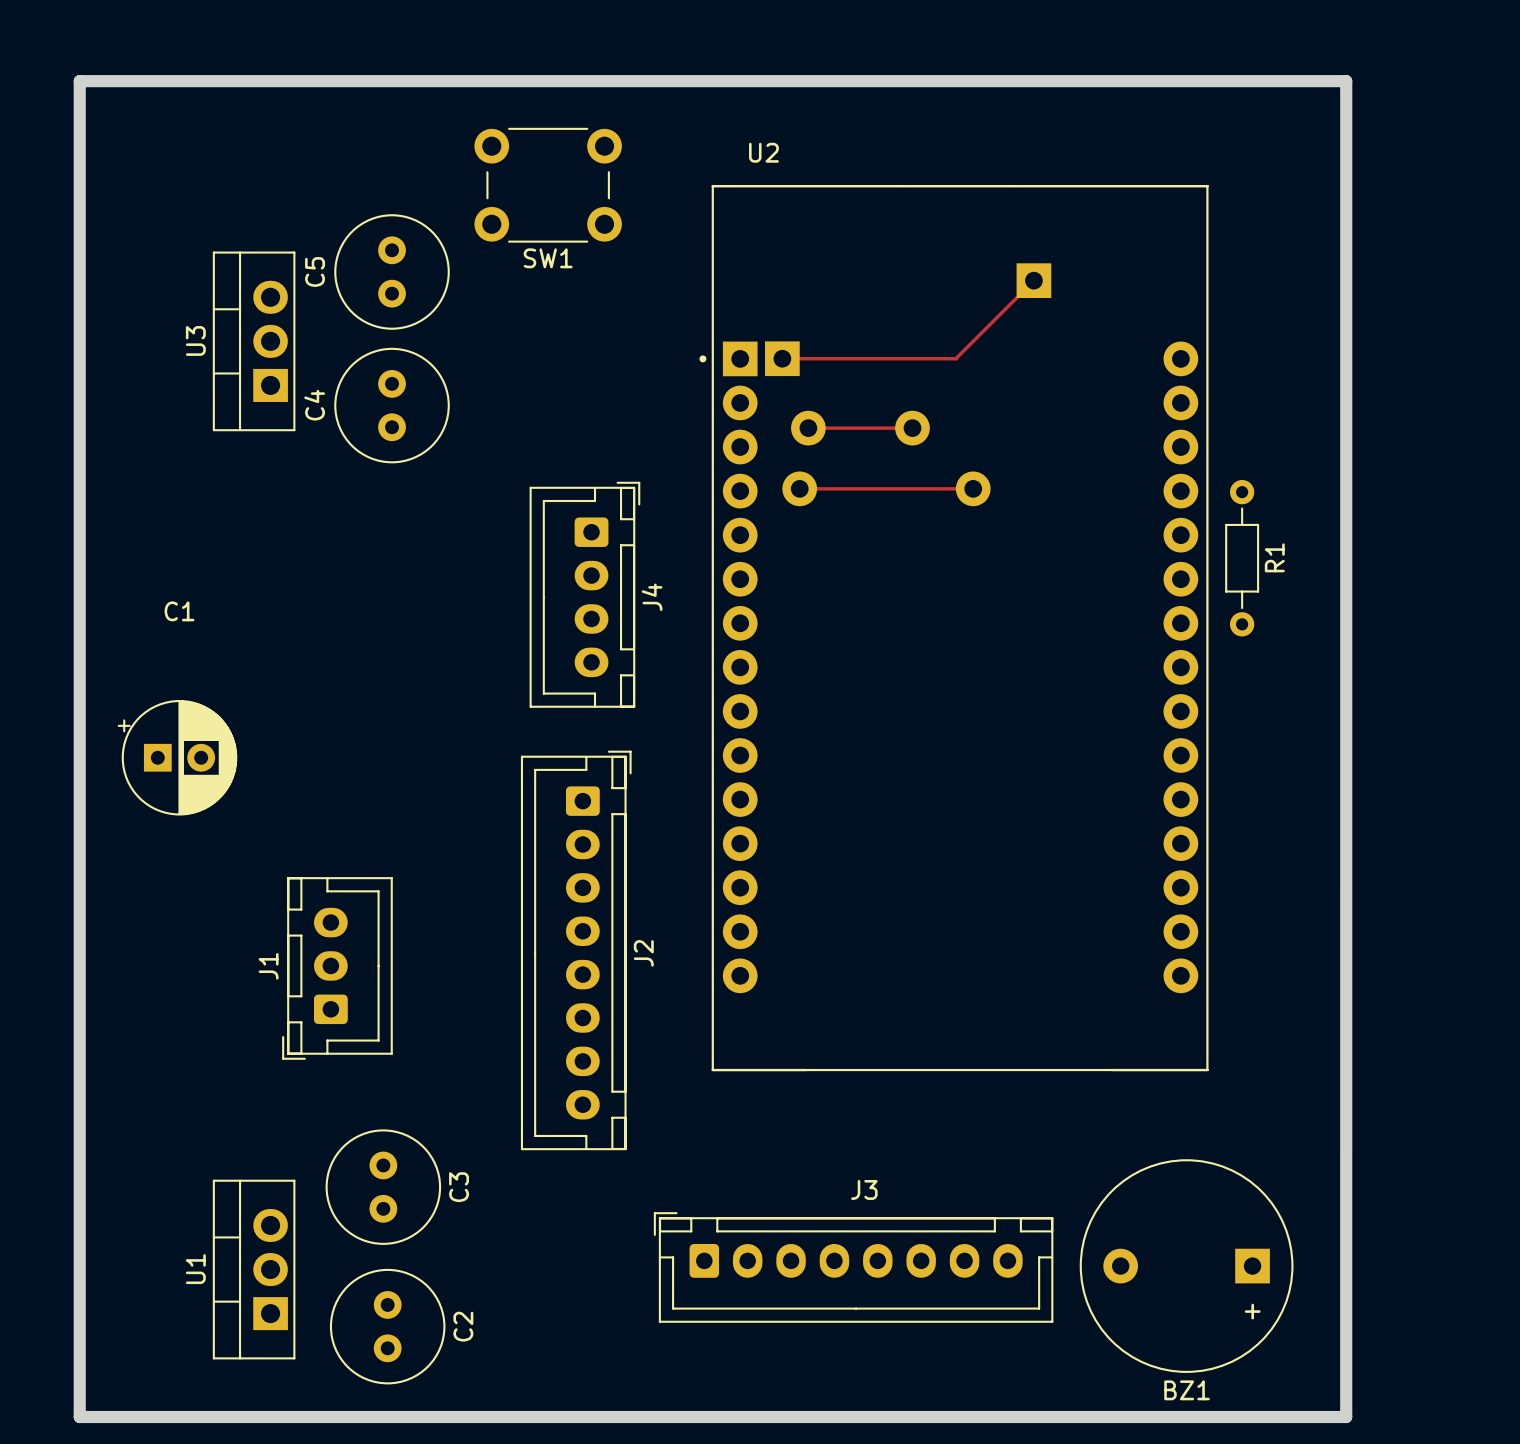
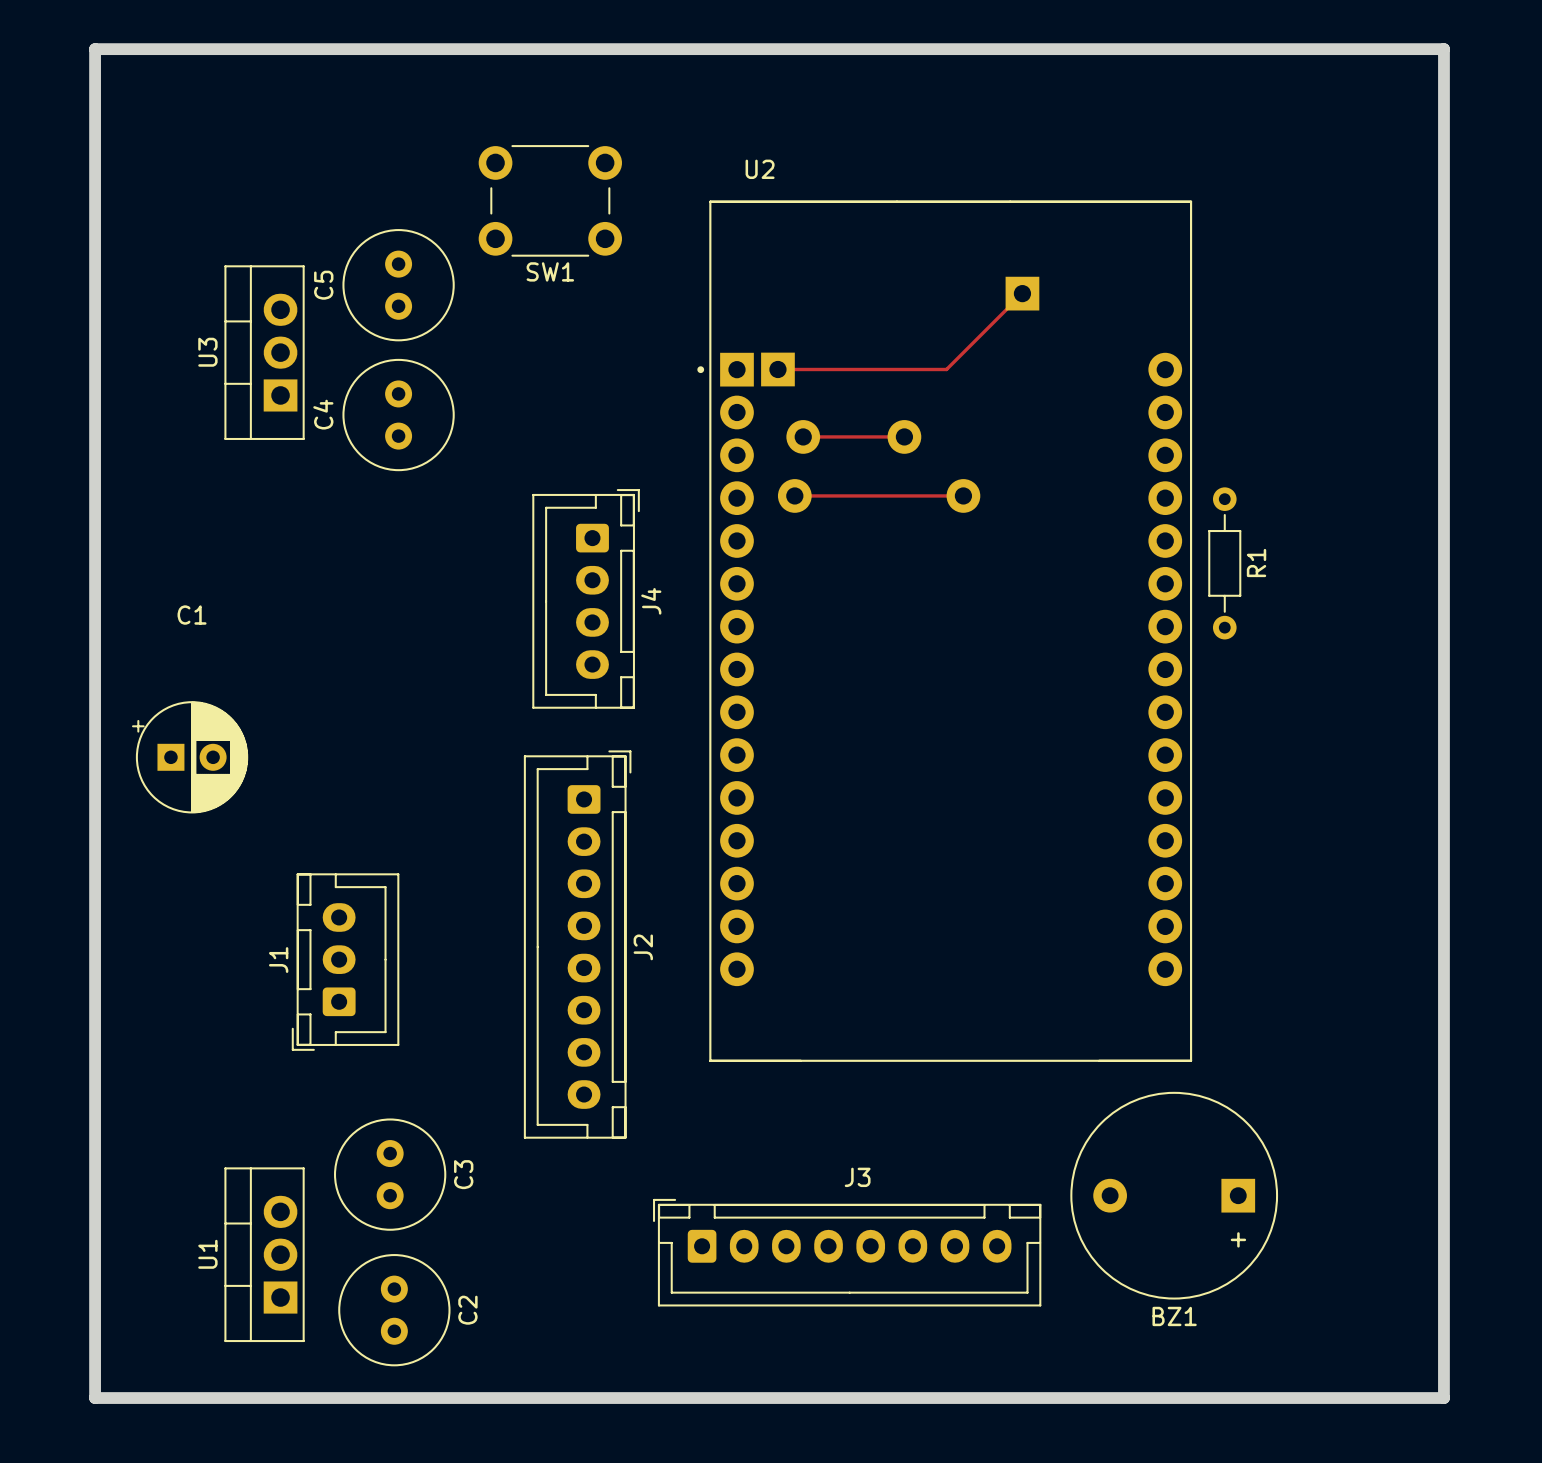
board edge: (79, 81) (1346, 81) (1346, 1417) -> (95, 99) (95, 49) (1443, 49) (1443, 1398) (1325, 1398)
BZ1 position: (1186, 1266) -> (1174, 1195)

